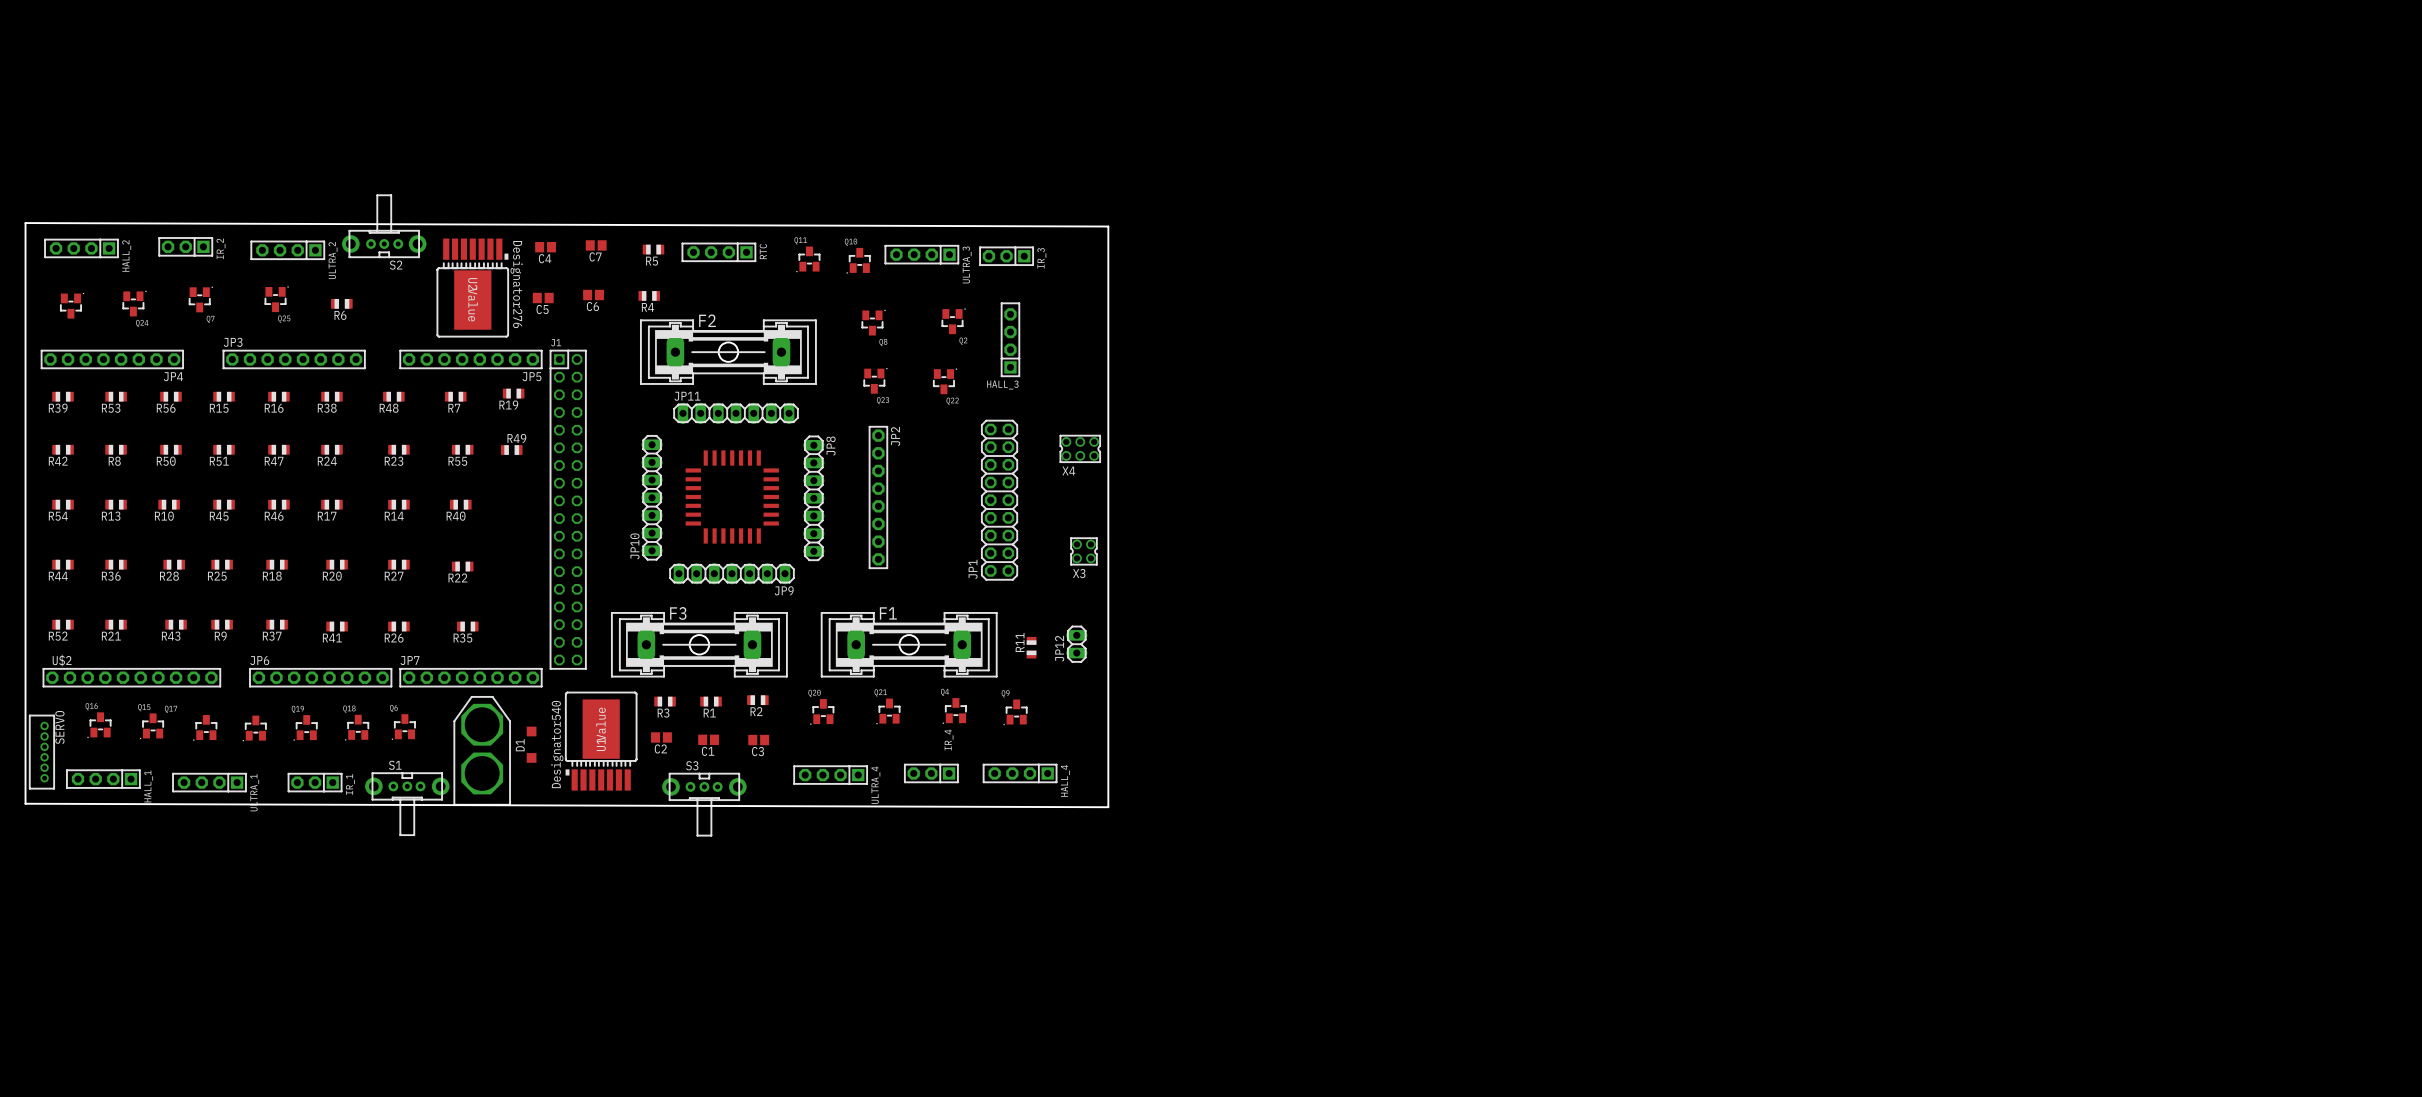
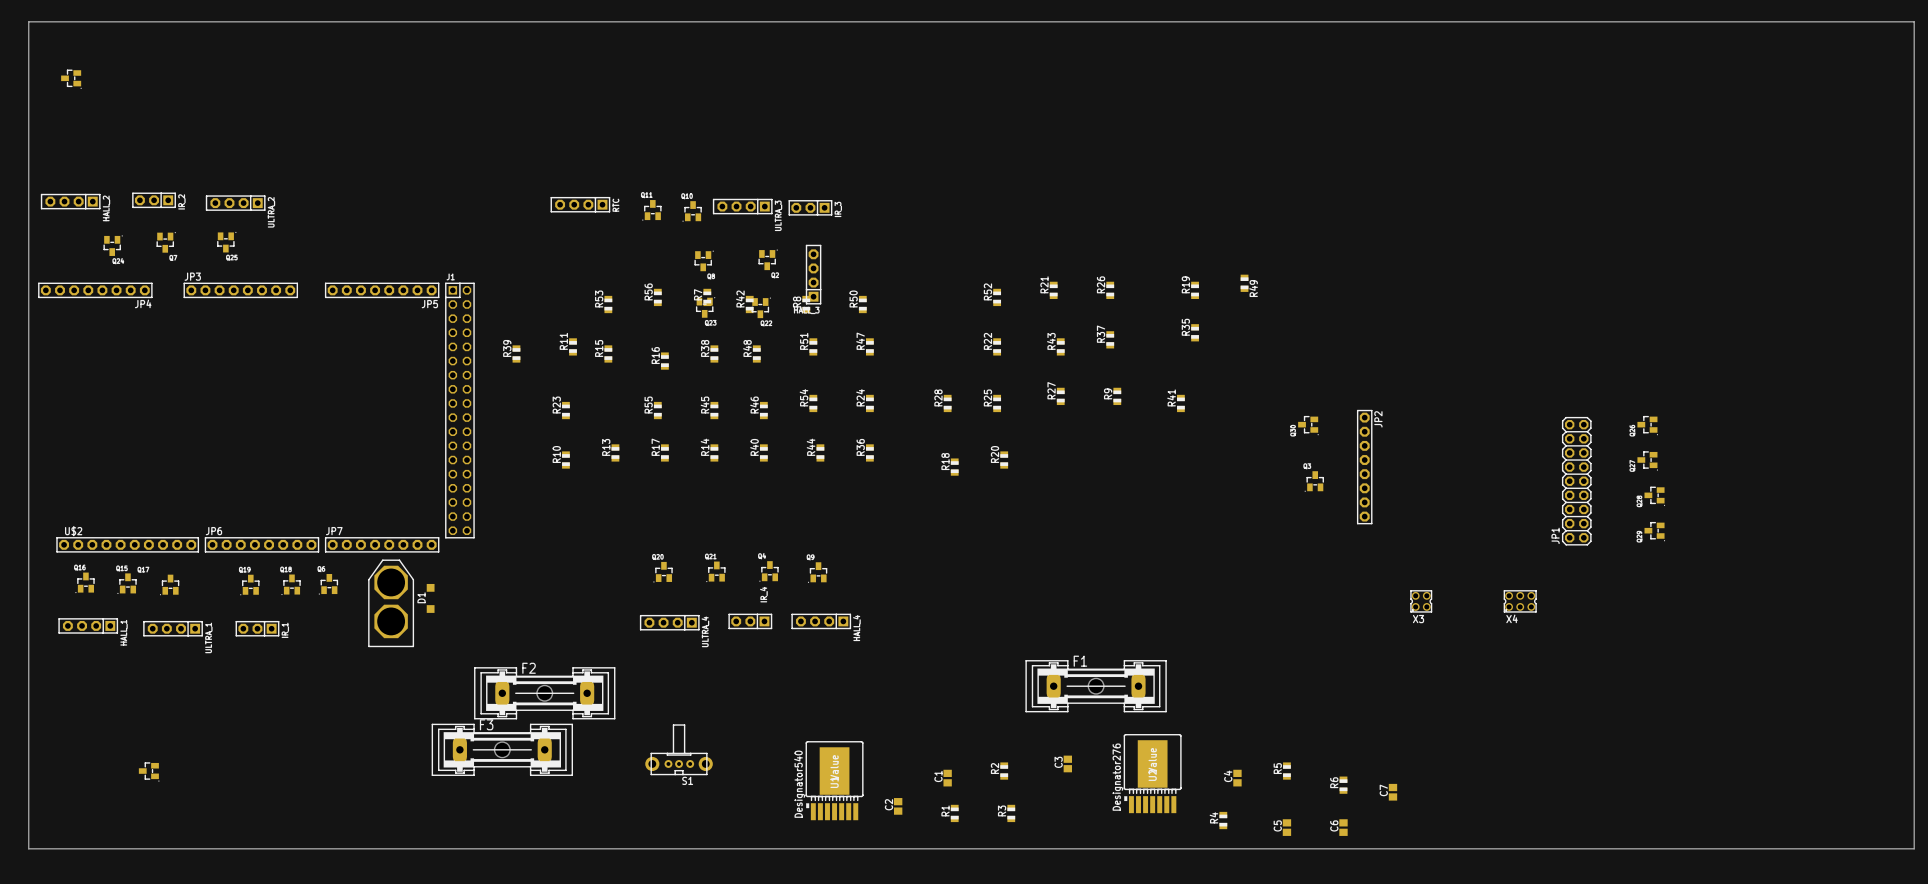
board edge: none -> (28, 21) (1914, 21) (1914, 848) (28, 848) (28, 21)
part: none -> (71, 79)
board edge: (25, 223) (1108, 226) (1108, 807) (25, 803) (25, 223) -> none
S2: (384, 226) -> none
C7 rotation: 0° (596, 245) -> 90° clockwise (1392, 792)
C7 position: (596, 245) -> (1392, 792)
C4 rotation: 0° (545, 247) -> 90° clockwise (1237, 778)
C4 position: (545, 247) -> (1237, 778)
R5 rotation: 0° (653, 249) -> 90° clockwise (1286, 771)
R5 position: (653, 249) -> (1286, 771)
U2 rotation: 0° (472, 287) -> 180° (1152, 773)
U2 position: (472, 287) -> (1152, 773)
C6 rotation: 0° (593, 295) -> 90° clockwise (1343, 827)
C6 position: (593, 295) -> (1343, 827)
R4 rotation: 0° (649, 295) -> 90° clockwise (1223, 820)
R4 position: (649, 295) -> (1223, 820)
C5 rotation: 0° (543, 298) -> 90° clockwise (1286, 827)
C5 position: (543, 298) -> (1286, 827)
R6 rotation: 0° (341, 303) -> 90° clockwise (1343, 785)
R6 position: (341, 303) -> (1343, 785)
part: (72, 305) -> none
F2 position: (728, 352) -> (544, 693)
R19 rotation: 0° (513, 393) -> 90° clockwise (1195, 290)
R19 position: (513, 393) -> (1195, 290)
R39 rotation: 0° (63, 396) -> 90° clockwise (516, 353)
R39 position: (63, 396) -> (516, 353)
R53 rotation: 0° (116, 396) -> 90° clockwise (608, 304)
R53 position: (116, 396) -> (608, 304)
R56 rotation: 0° (170, 396) -> 90° clockwise (657, 297)
R56 position: (170, 396) -> (657, 297)
R15 rotation: 0° (224, 396) -> 90° clockwise (608, 353)
R15 position: (224, 396) -> (608, 353)
R16 rotation: 0° (278, 396) -> 90° clockwise (664, 361)
R16 position: (278, 396) -> (664, 361)
R38 rotation: 0° (331, 396) -> 90° clockwise (714, 353)
R38 position: (331, 396) -> (714, 353)
R48 rotation: 0° (393, 396) -> 90° clockwise (756, 353)
R48 position: (393, 396) -> (756, 353)
R7 rotation: 0° (455, 396) -> 90° clockwise (707, 297)
R7 position: (455, 396) -> (707, 297)
JP11: (736, 413) -> none
X4 position: (1080, 448) -> (1520, 601)
R42 rotation: 0° (63, 449) -> 90° clockwise (749, 304)
R42 position: (63, 449) -> (749, 304)
R8 rotation: 0° (116, 449) -> 90° clockwise (806, 304)
R8 position: (116, 449) -> (806, 304)
R50 rotation: 0° (170, 449) -> 90° clockwise (862, 304)
R50 position: (170, 449) -> (862, 304)
R51 rotation: 0° (224, 449) -> 90° clockwise (813, 346)
R51 position: (224, 449) -> (813, 346)
R47 rotation: 0° (278, 449) -> 90° clockwise (869, 346)
R47 position: (278, 449) -> (869, 346)
R24 rotation: 0° (331, 449) -> 90° clockwise (869, 403)
R24 position: (331, 449) -> (869, 403)
R23 rotation: 0° (398, 449) -> 90° clockwise (565, 410)
R23 position: (398, 449) -> (565, 410)
R55 rotation: 0° (462, 449) -> 90° clockwise (657, 410)
R55 position: (462, 449) -> (657, 410)
R49 rotation: 0° (511, 450) -> 90° clockwise (1244, 283)
R49 position: (511, 450) -> (1244, 283)
JP10: (652, 497) -> none
part: (732, 497) -> none
JP2 position: (878, 497) -> (1364, 467)
JP8: (813, 498) -> none
JP1 position: (999, 500) -> (1576, 481)
R54 rotation: 0° (63, 504) -> 90° clockwise (813, 403)
R54 position: (63, 504) -> (813, 403)
R13 rotation: 0° (116, 504) -> 90° clockwise (615, 452)
R13 position: (116, 504) -> (615, 452)
R10 rotation: 0° (169, 504) -> 90° clockwise (565, 460)
R10 position: (169, 504) -> (565, 460)
R45 rotation: 0° (224, 504) -> 90° clockwise (714, 410)
R45 position: (224, 504) -> (714, 410)
R46 rotation: 0° (278, 504) -> 90° clockwise (763, 410)
R46 position: (278, 504) -> (763, 410)
R17 rotation: 0° (331, 504) -> 90° clockwise (664, 452)
R17 position: (331, 504) -> (664, 452)
R14 rotation: 0° (398, 504) -> 90° clockwise (714, 452)
R14 position: (398, 504) -> (714, 452)
R40 rotation: 0° (460, 504) -> 90° clockwise (763, 452)
R40 position: (460, 504) -> (763, 452)
part: none -> (1308, 425)
part: none -> (1647, 425)
X3 position: (1083, 551) -> (1421, 601)
R44 rotation: 0° (63, 564) -> 90° clockwise (820, 452)
R44 position: (63, 564) -> (820, 452)
R36 rotation: 0° (116, 564) -> 90° clockwise (869, 452)
R36 position: (116, 564) -> (869, 452)
R28 rotation: 0° (174, 564) -> 90° clockwise (947, 403)
R28 position: (174, 564) -> (947, 403)
R25 rotation: 0° (222, 564) -> 90° clockwise (997, 403)
R25 position: (222, 564) -> (997, 403)
R18 rotation: 0° (277, 564) -> 90° clockwise (954, 467)
R18 position: (277, 564) -> (954, 467)
R20 rotation: 0° (337, 564) -> 90° clockwise (1004, 460)
R20 position: (337, 564) -> (1004, 460)
R27 rotation: 0° (398, 564) -> 90° clockwise (1060, 396)
R27 position: (398, 564) -> (1060, 396)
R22 rotation: 0° (462, 566) -> 90° clockwise (997, 346)
R22 position: (462, 566) -> (997, 346)
part: none -> (1647, 461)
JP9: (731, 573) -> none
part: none -> (1314, 481)
part: none -> (1654, 496)
R52 rotation: 0° (63, 624) -> 90° clockwise (997, 297)
R52 position: (63, 624) -> (997, 297)
R21 rotation: 0° (116, 624) -> 90° clockwise (1053, 290)
R21 position: (116, 624) -> (1053, 290)
R43 rotation: 0° (176, 624) -> 90° clockwise (1060, 346)
R43 position: (176, 624) -> (1060, 346)
R9 rotation: 0° (222, 624) -> 90° clockwise (1117, 396)
R9 position: (222, 624) -> (1117, 396)
R37 rotation: 0° (277, 624) -> 90° clockwise (1110, 339)
R37 position: (277, 624) -> (1110, 339)
R41 rotation: 0° (337, 626) -> 90° clockwise (1180, 403)
R41 position: (337, 626) -> (1180, 403)
R26 rotation: 0° (398, 626) -> 90° clockwise (1110, 290)
R26 position: (398, 626) -> (1110, 290)
R35 rotation: 0° (467, 626) -> 90° clockwise (1195, 332)
R35 position: (467, 626) -> (1195, 332)
F3 position: (699, 644) -> (502, 749)
F1 position: (909, 644) -> (1096, 686)
JP12: (1076, 644) -> none
R11 position: (1031, 647) -> (573, 346)
part: none -> (1654, 531)
U$2 position: (131, 677) -> (127, 544)
R2 rotation: 0° (757, 700) -> 90° clockwise (1004, 771)
R2 position: (757, 700) -> (1004, 771)
R3 rotation: 0° (665, 701) -> 90° clockwise (1011, 813)
R3 position: (665, 701) -> (1011, 813)
R1 rotation: 0° (711, 701) -> 90° clockwise (954, 813)
R1 position: (711, 701) -> (954, 813)
part: (254, 728) -> none
C2 rotation: 0° (661, 737) -> 90° clockwise (898, 806)
C2 position: (661, 737) -> (898, 806)
C1 rotation: 0° (708, 739) -> 90° clockwise (947, 778)
C1 position: (708, 739) -> (947, 778)
C3 rotation: 0° (758, 740) -> 90° clockwise (1067, 763)
C3 position: (758, 740) -> (1067, 763)
U1 position: (601, 741) -> (834, 780)
SERVO: (41, 752) -> none
S1 rotation: 0° (407, 804) -> 180° (679, 749)
S1 position: (407, 804) -> (679, 749)
S3: (704, 804) -> none
part: none -> (149, 772)

